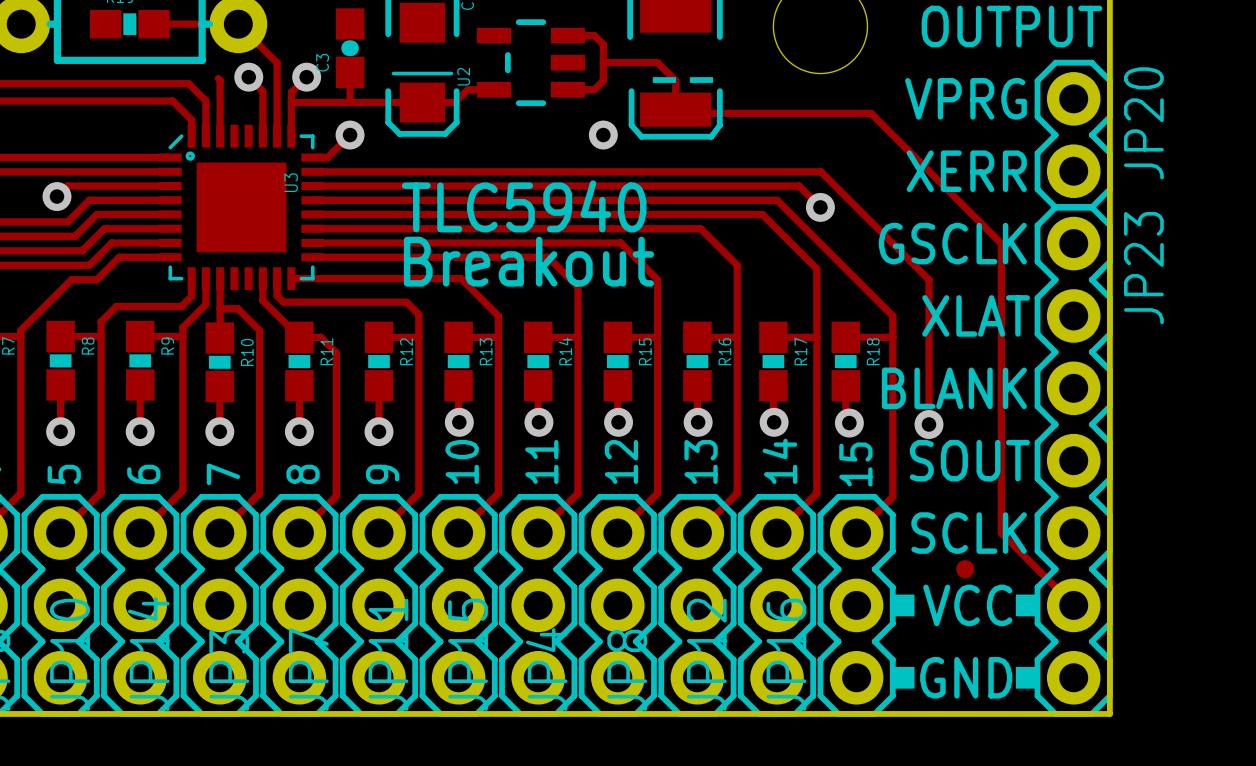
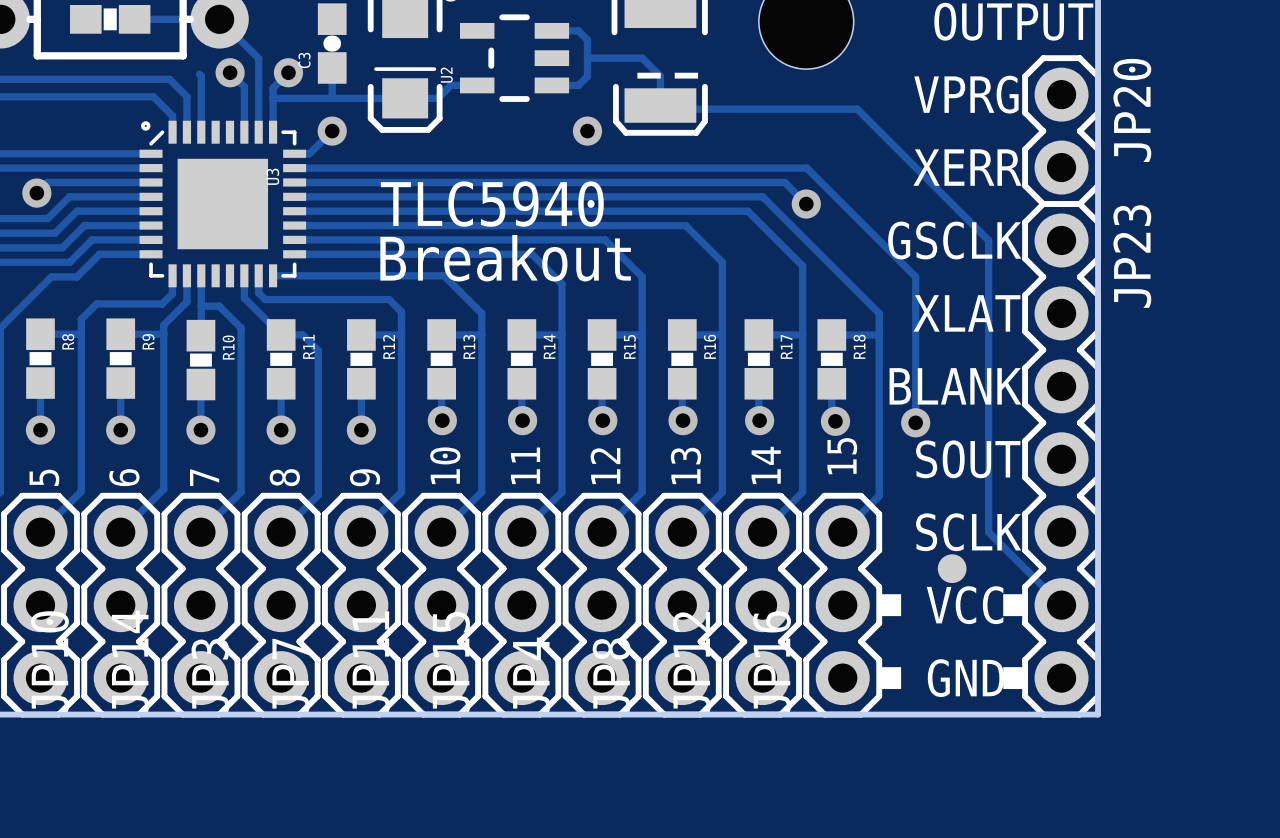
U3 footprint: [158, 124, 325, 291] -> [139, 120, 307, 288]
part footprint: [956, 560, 975, 579] -> [937, 554, 967, 584]

